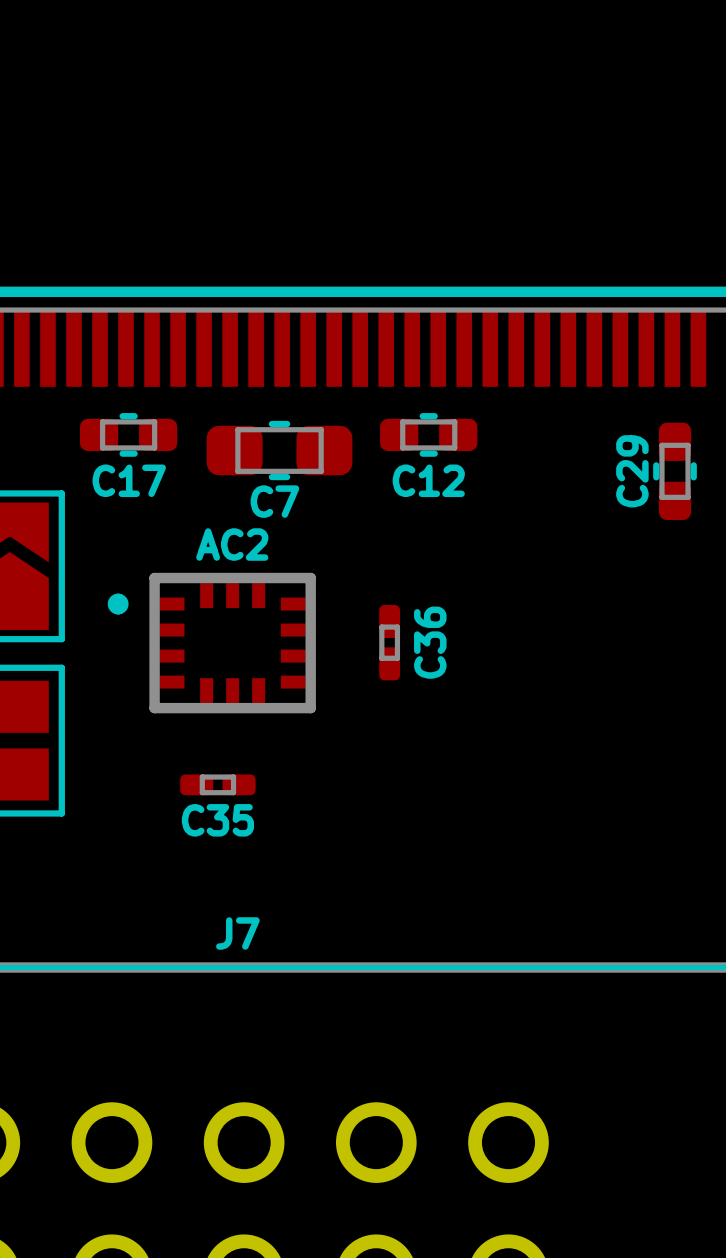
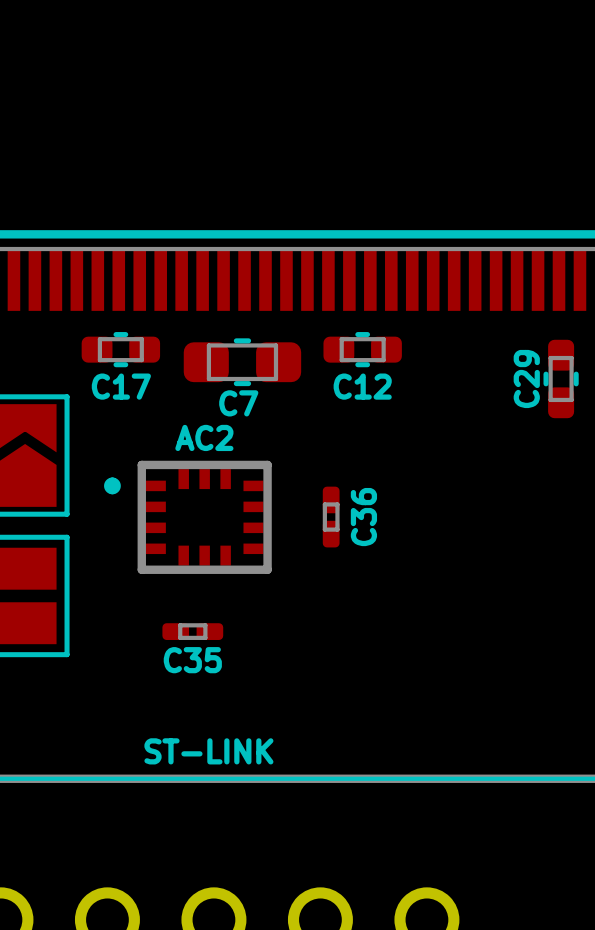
J7 name: J7 (237, 933) -> ST-LINK (208, 751)

